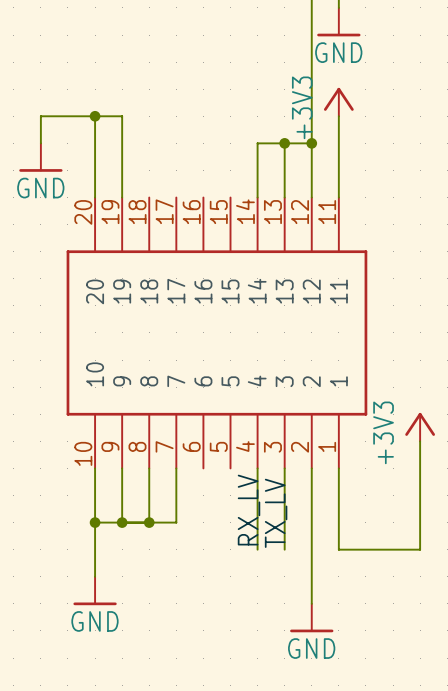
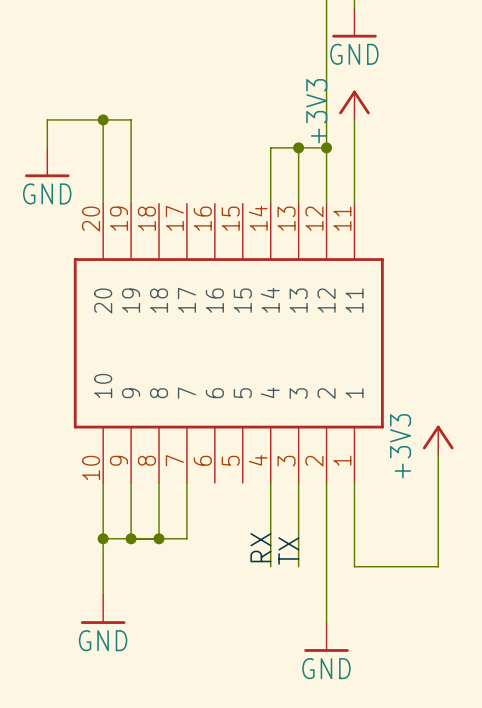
label: RX_LV (249, 510) -> RX (260, 547)
label: TX_LV (276, 513) -> TX (288, 551)

